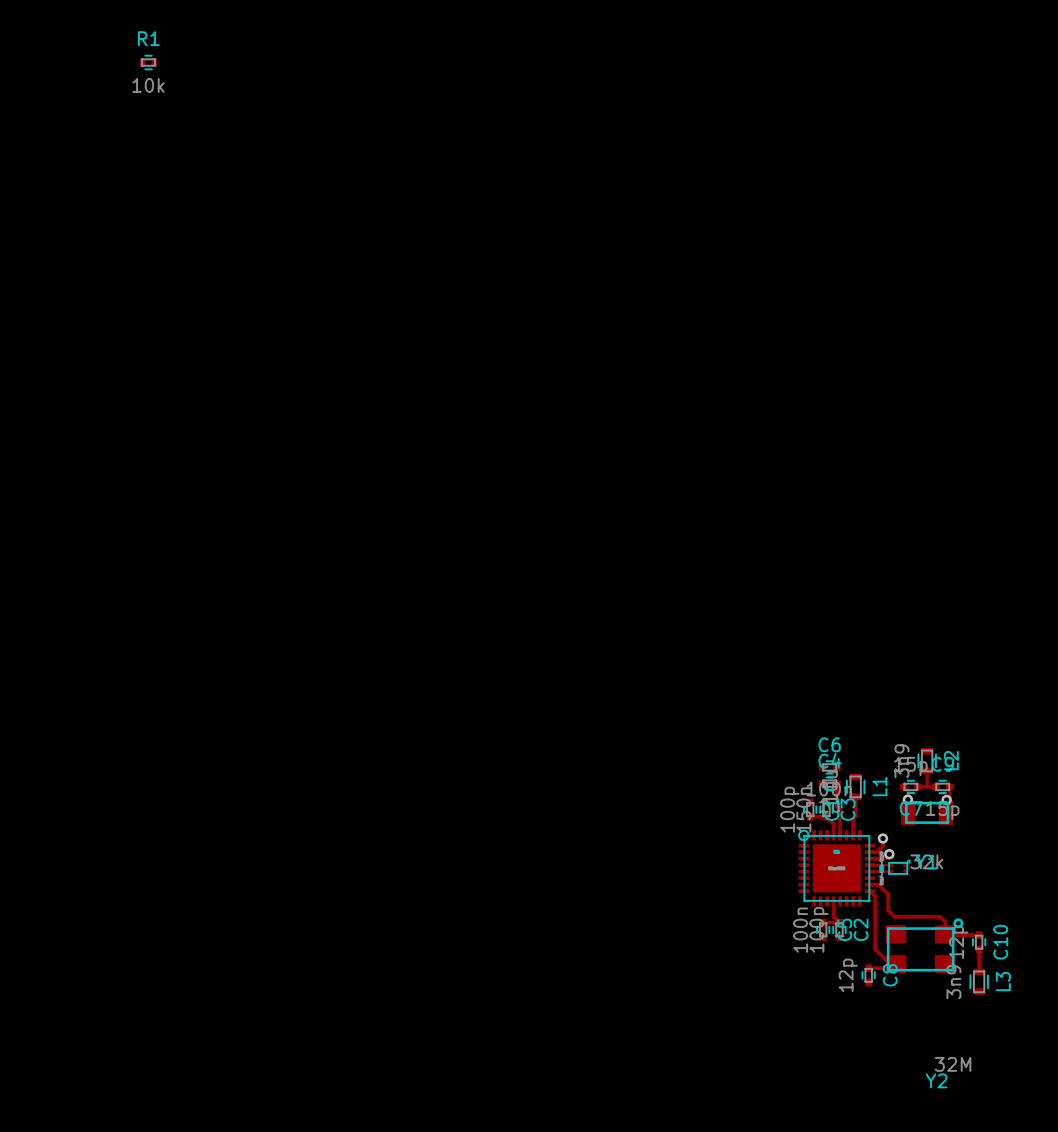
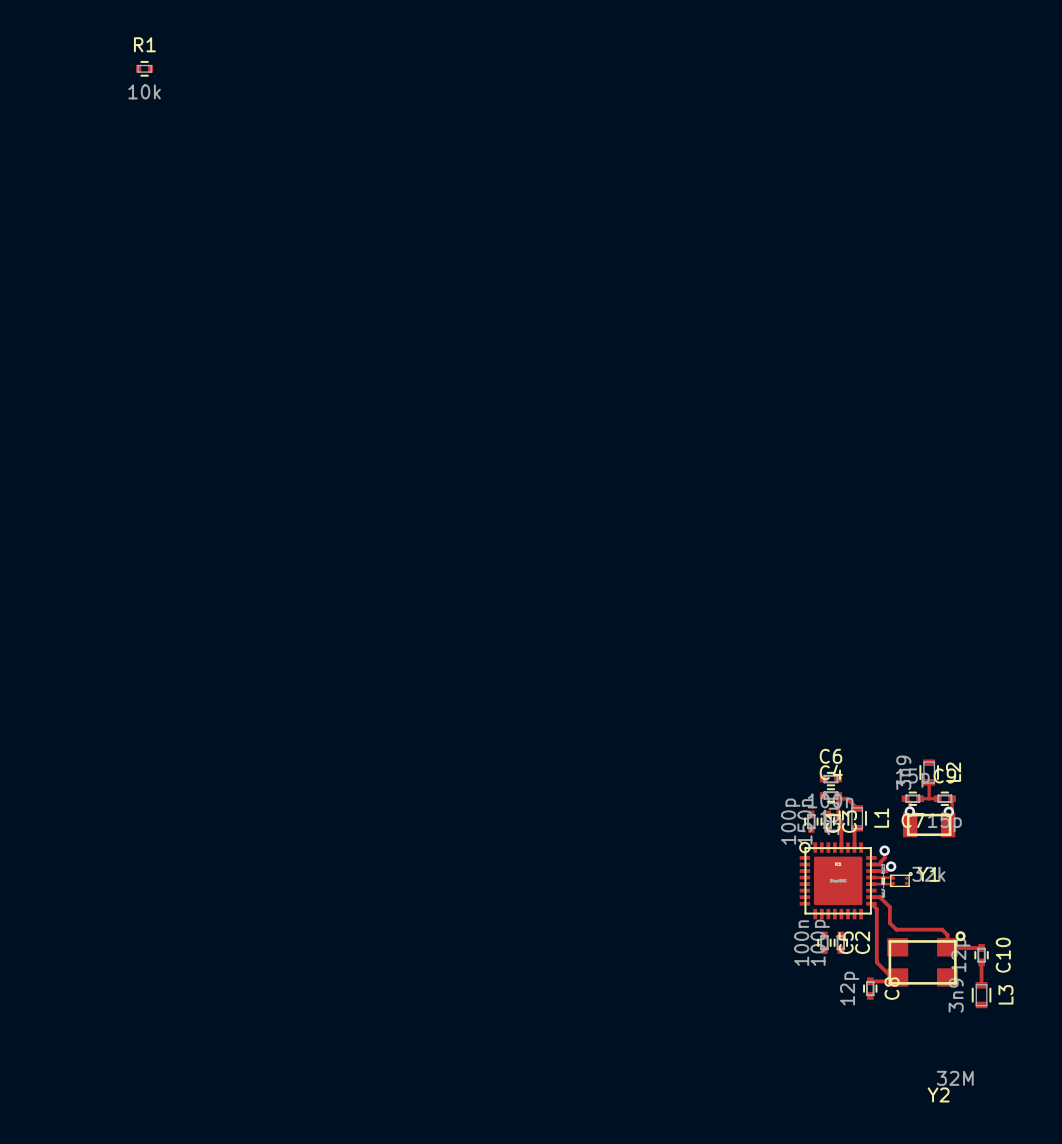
L1 position: (855, 786) -> (857, 818)
track: (855, 796) (855, 816) -> (857, 808) (847, 798) (838, 798)
track: (810, 816) (826, 816) (833, 823) (833, 835) -> none
track: (833, 901) (833, 916) (839, 922) (823, 922) -> none

